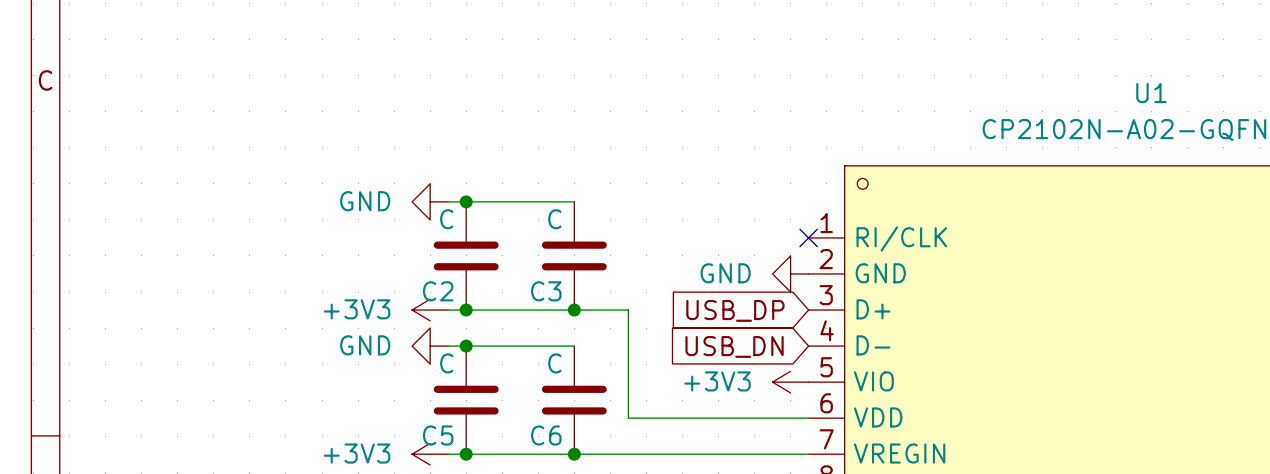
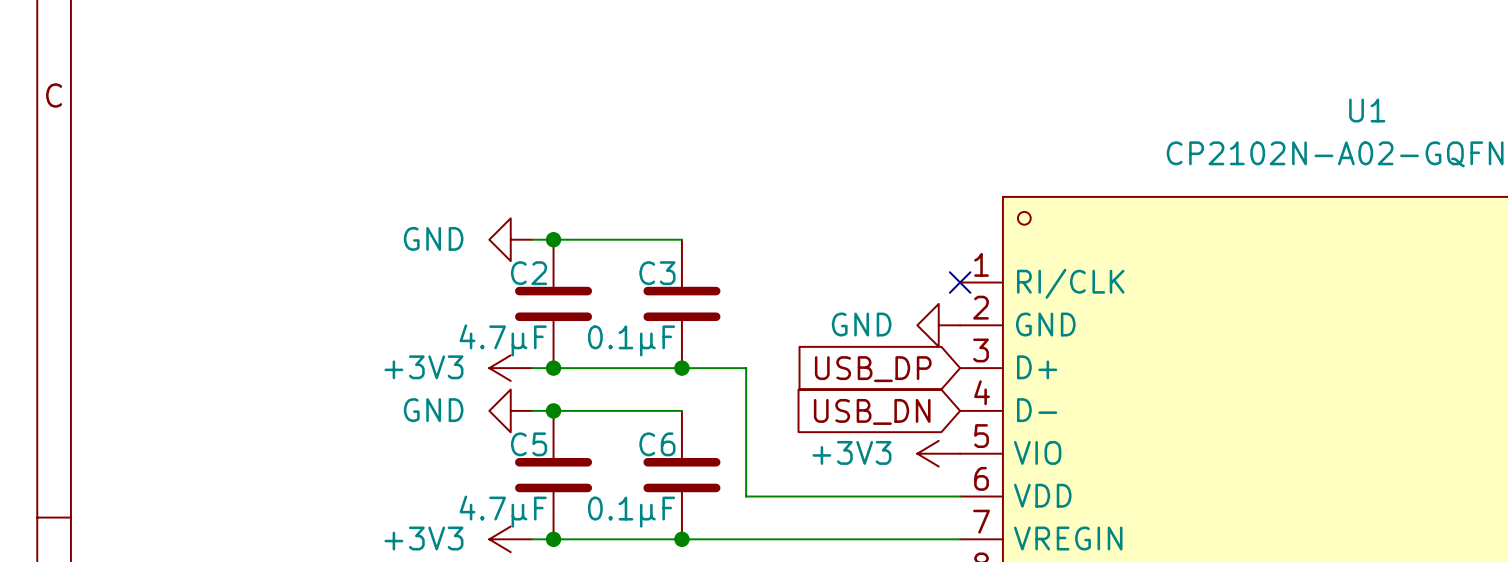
C2 value: C (446, 219) -> 4.7µF (503, 340)
C3 value: C (554, 219) -> 0.1µF (631, 340)
C2 name position: C2 (438, 291) -> C2 (529, 273)
C3 name position: C3 (546, 291) -> C3 (657, 273)
C5 value: C (446, 363) -> 4.7µF (503, 511)
C6 value: C (554, 363) -> 0.1µF (631, 512)
C5 name position: C5 (438, 435) -> C5 (529, 444)
C6 name position: C6 (546, 435) -> C6 (657, 444)

